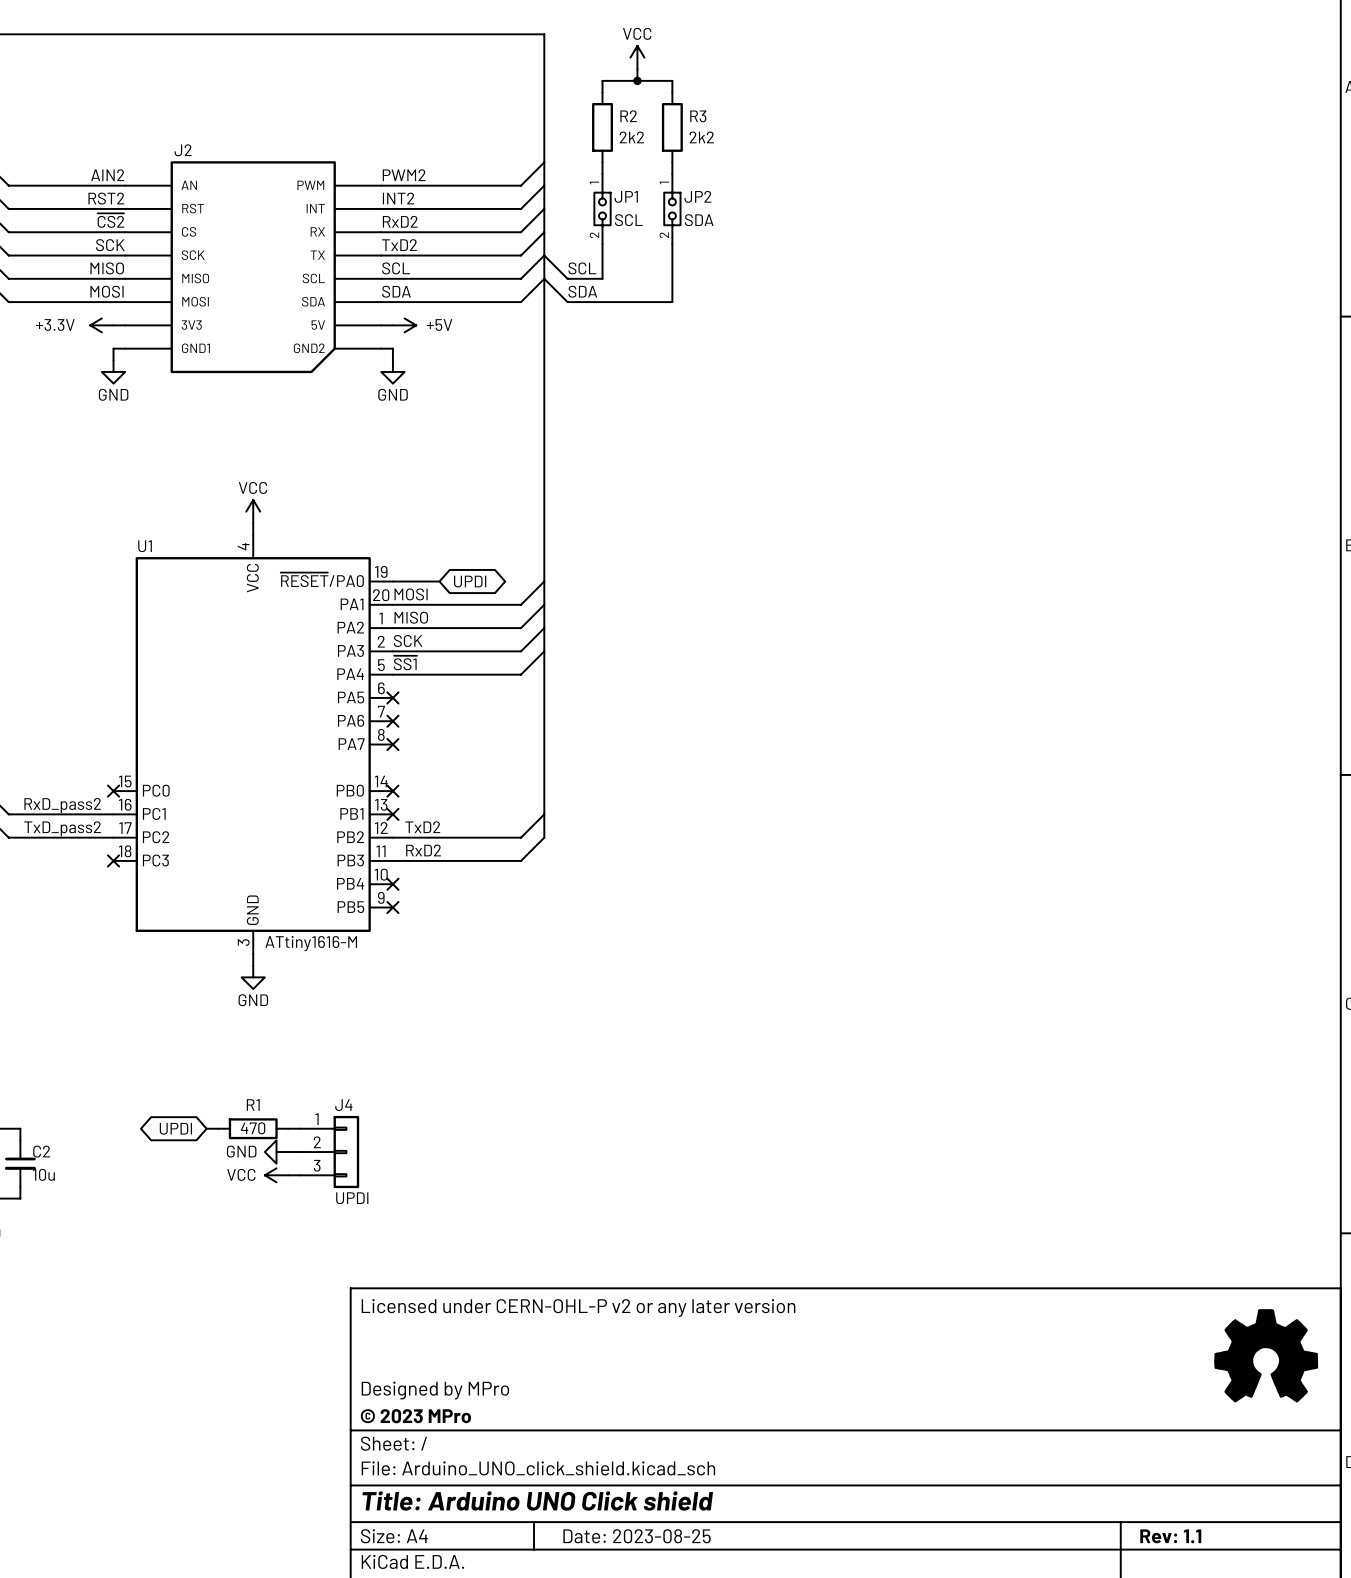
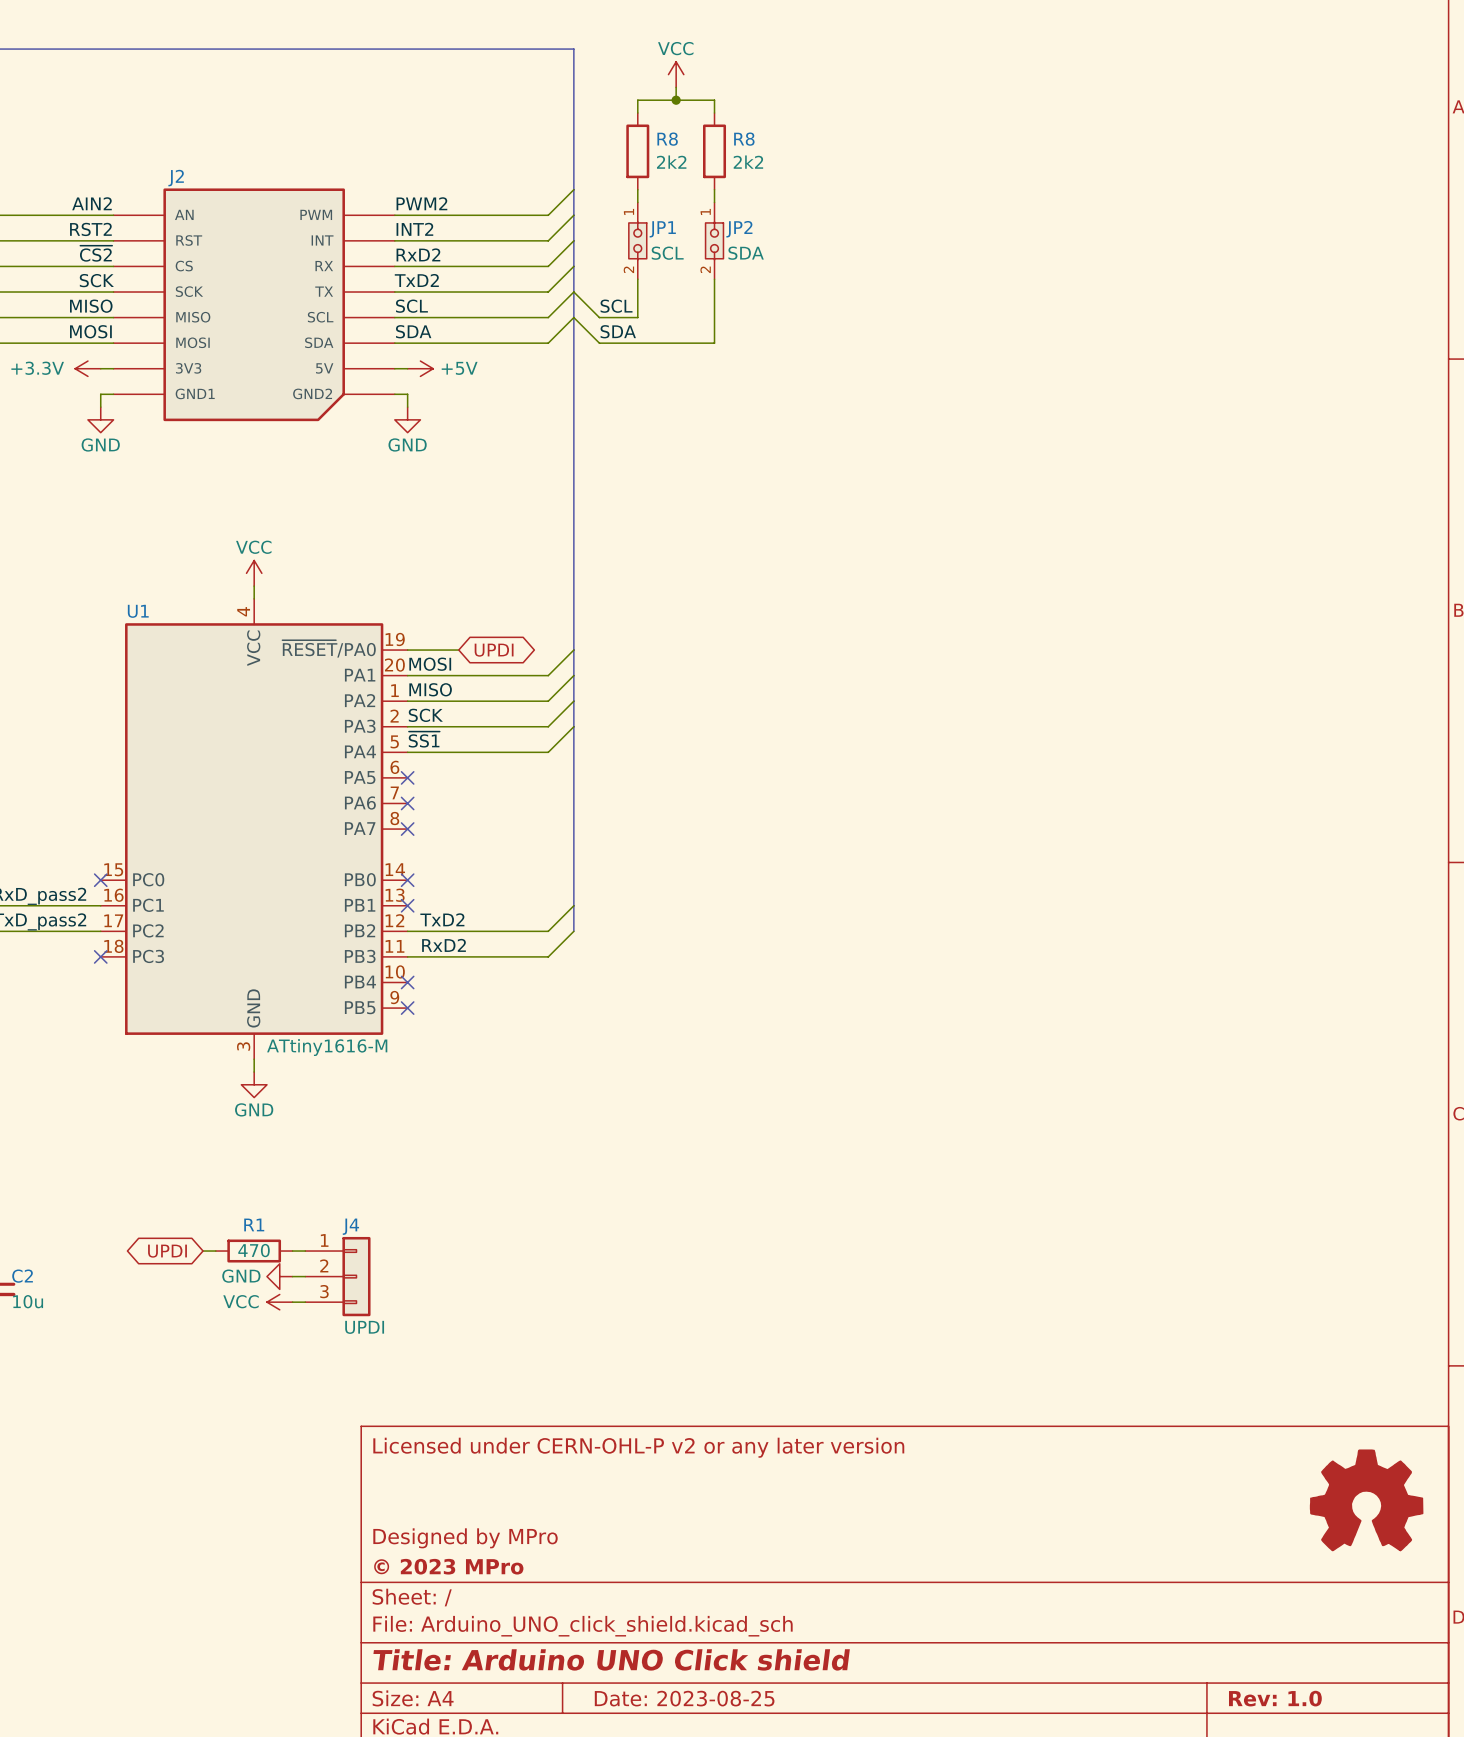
R2 name: R2 (628, 116) -> R8 (667, 139)
R3 name: R3 (698, 116) -> R8 (744, 139)
title block: Rev: 1.1 (1170, 1536) -> Rev: 1.0 (1275, 1698)

